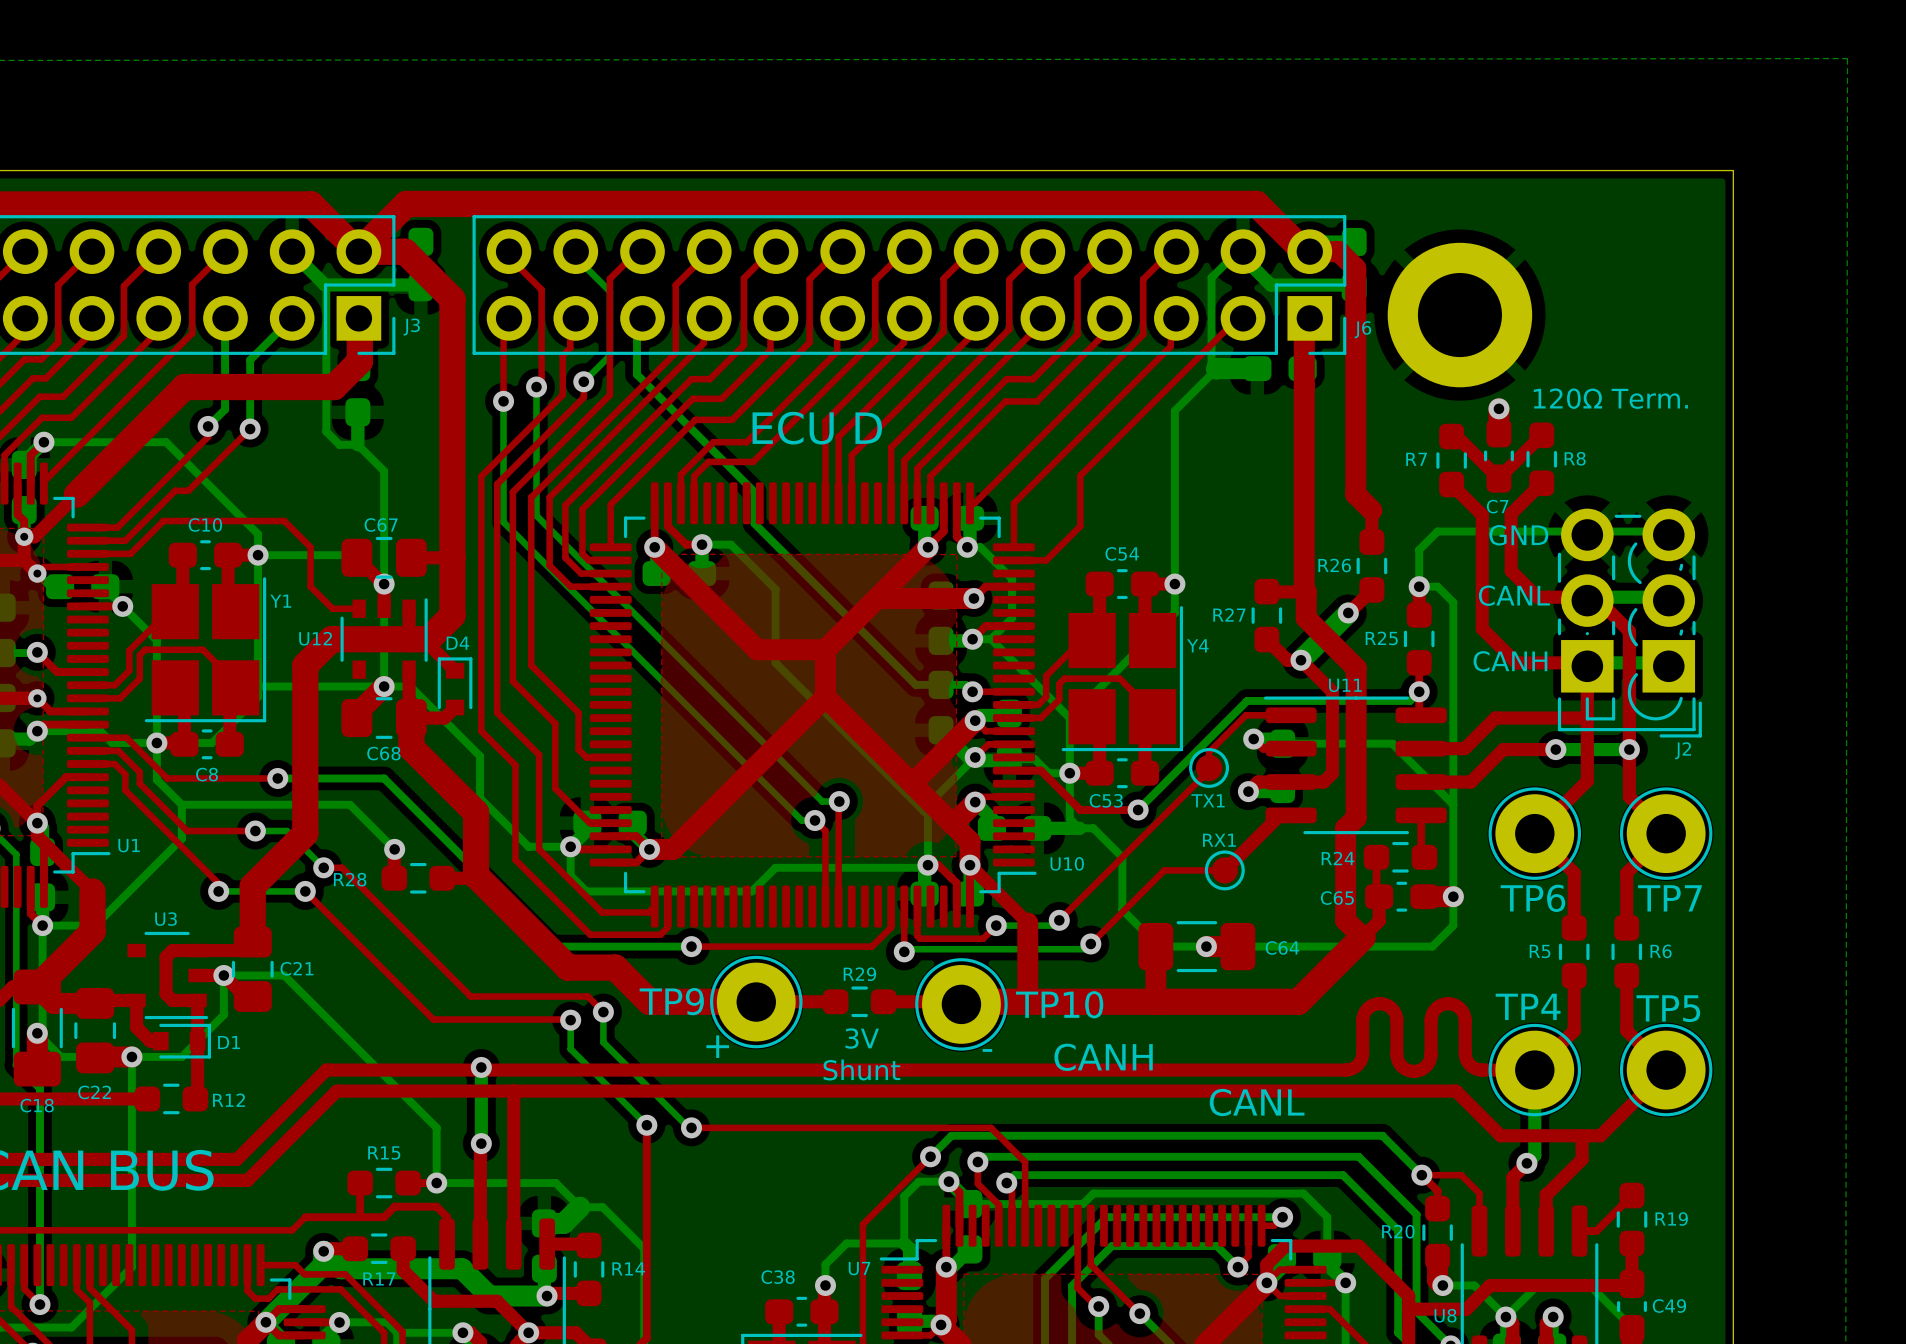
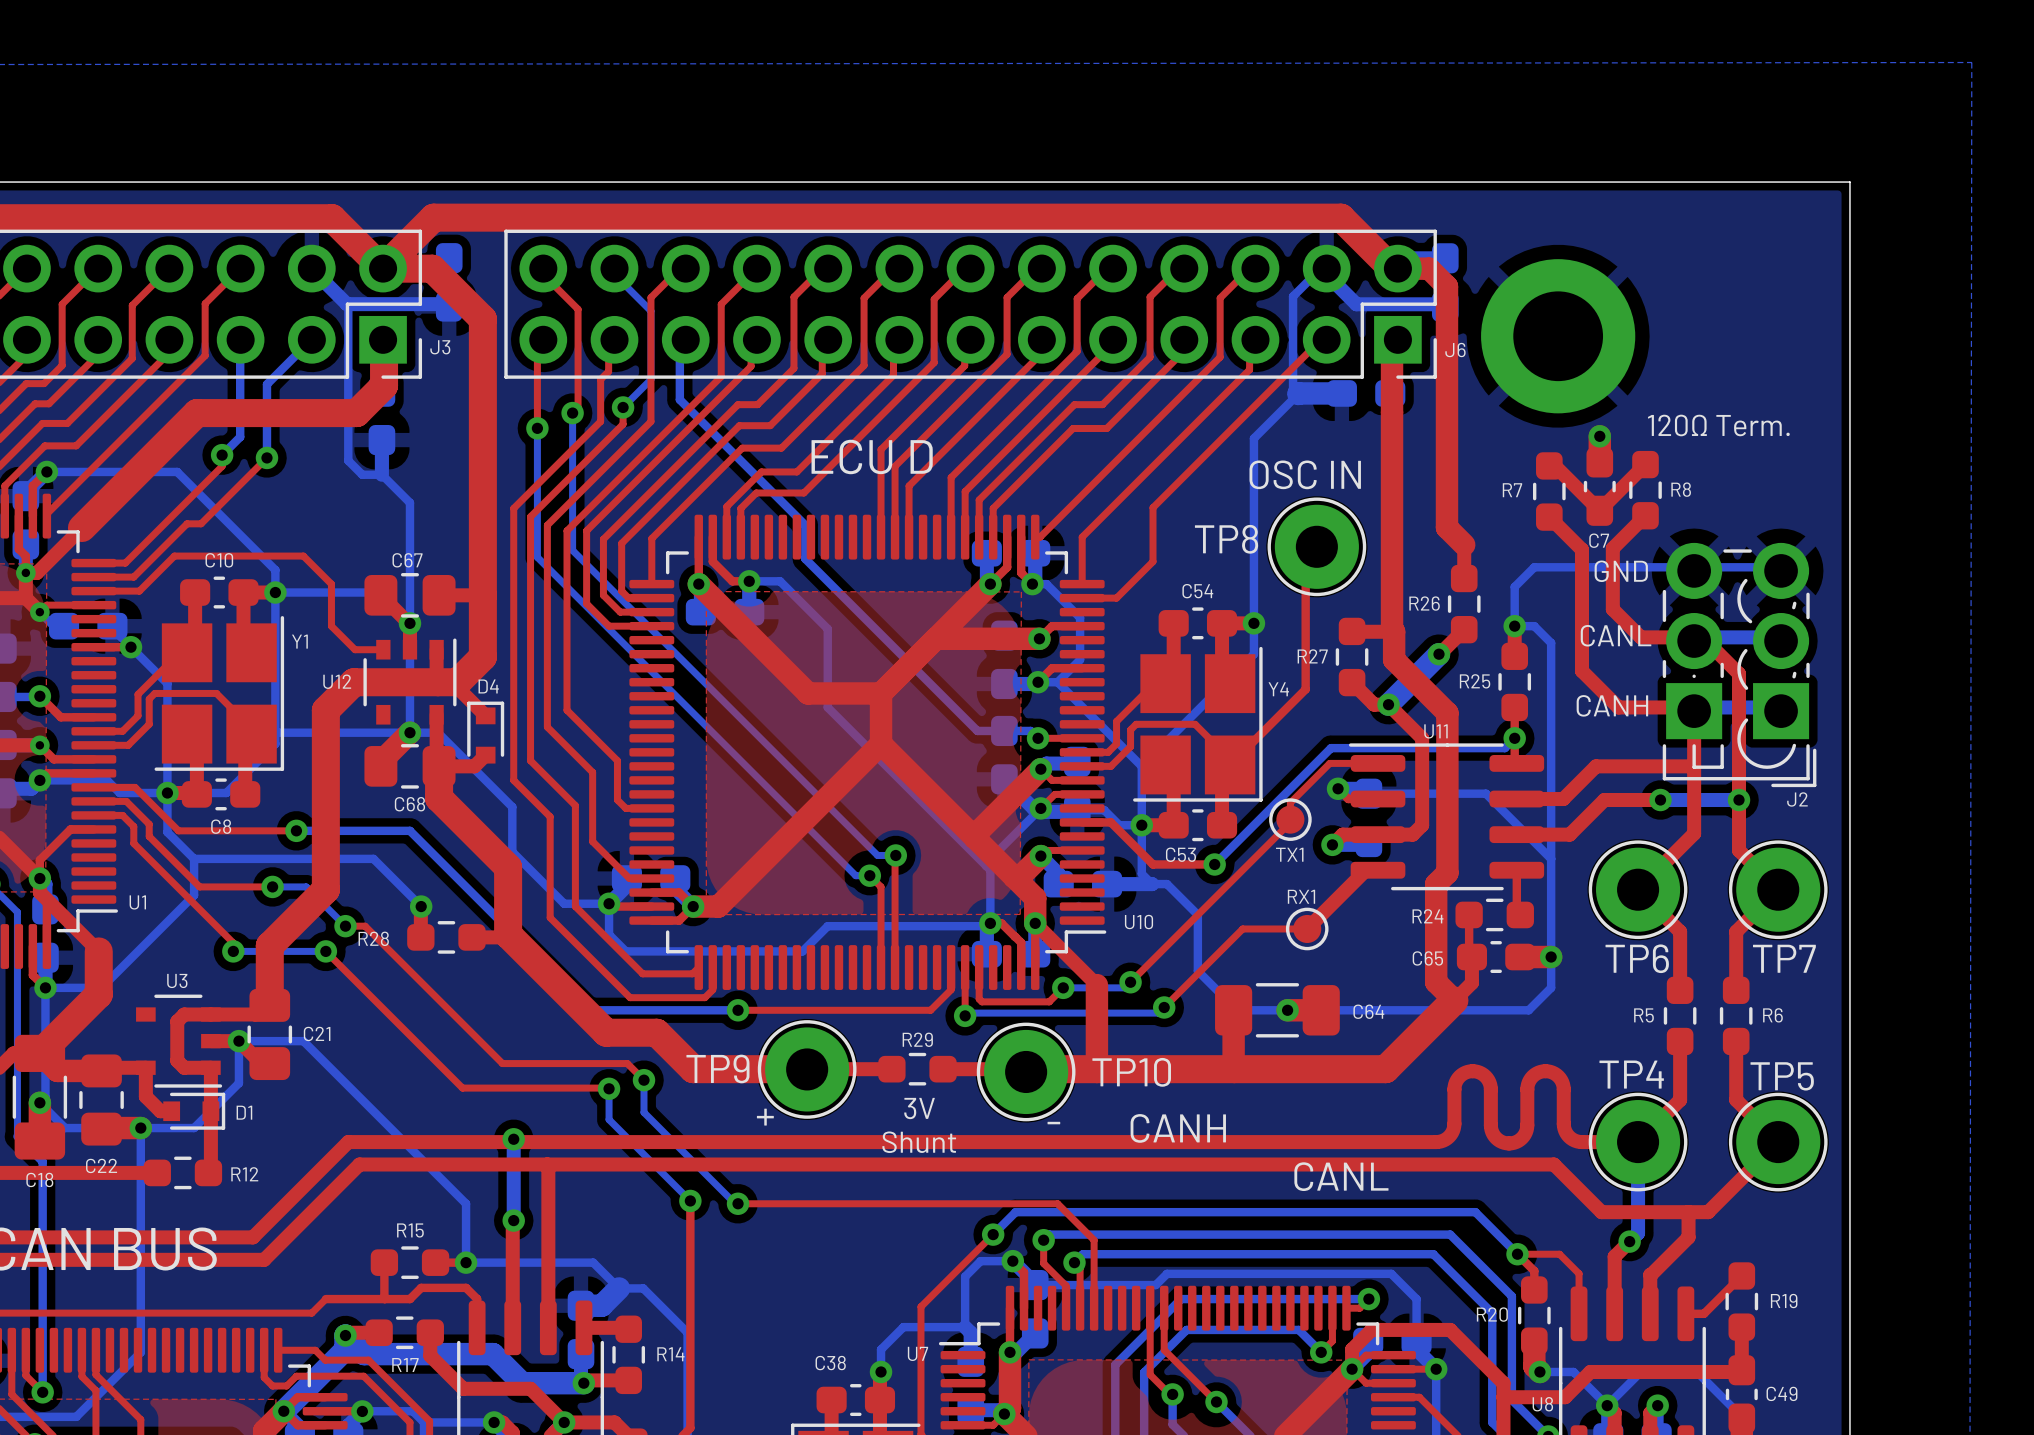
text: none -> OSC IN (1305, 474)
TP8: none -> (1316, 546)
top track: none -> (1305, 558) (1305, 689) (1230, 764)

